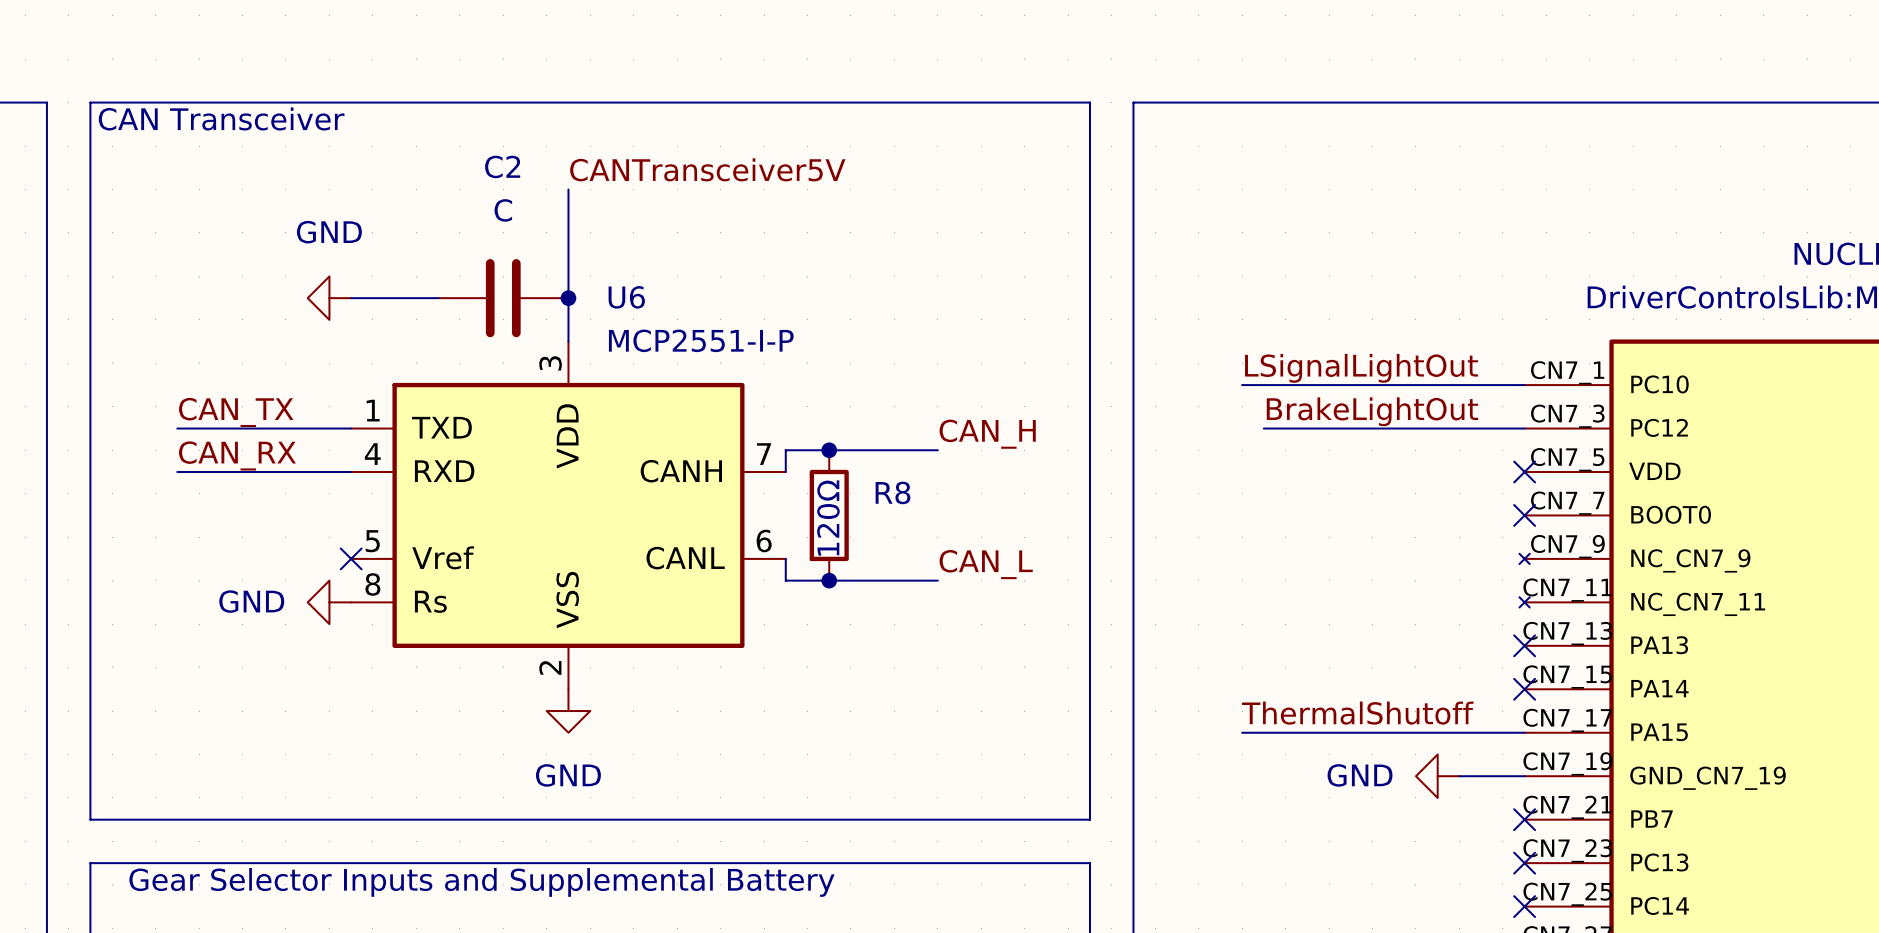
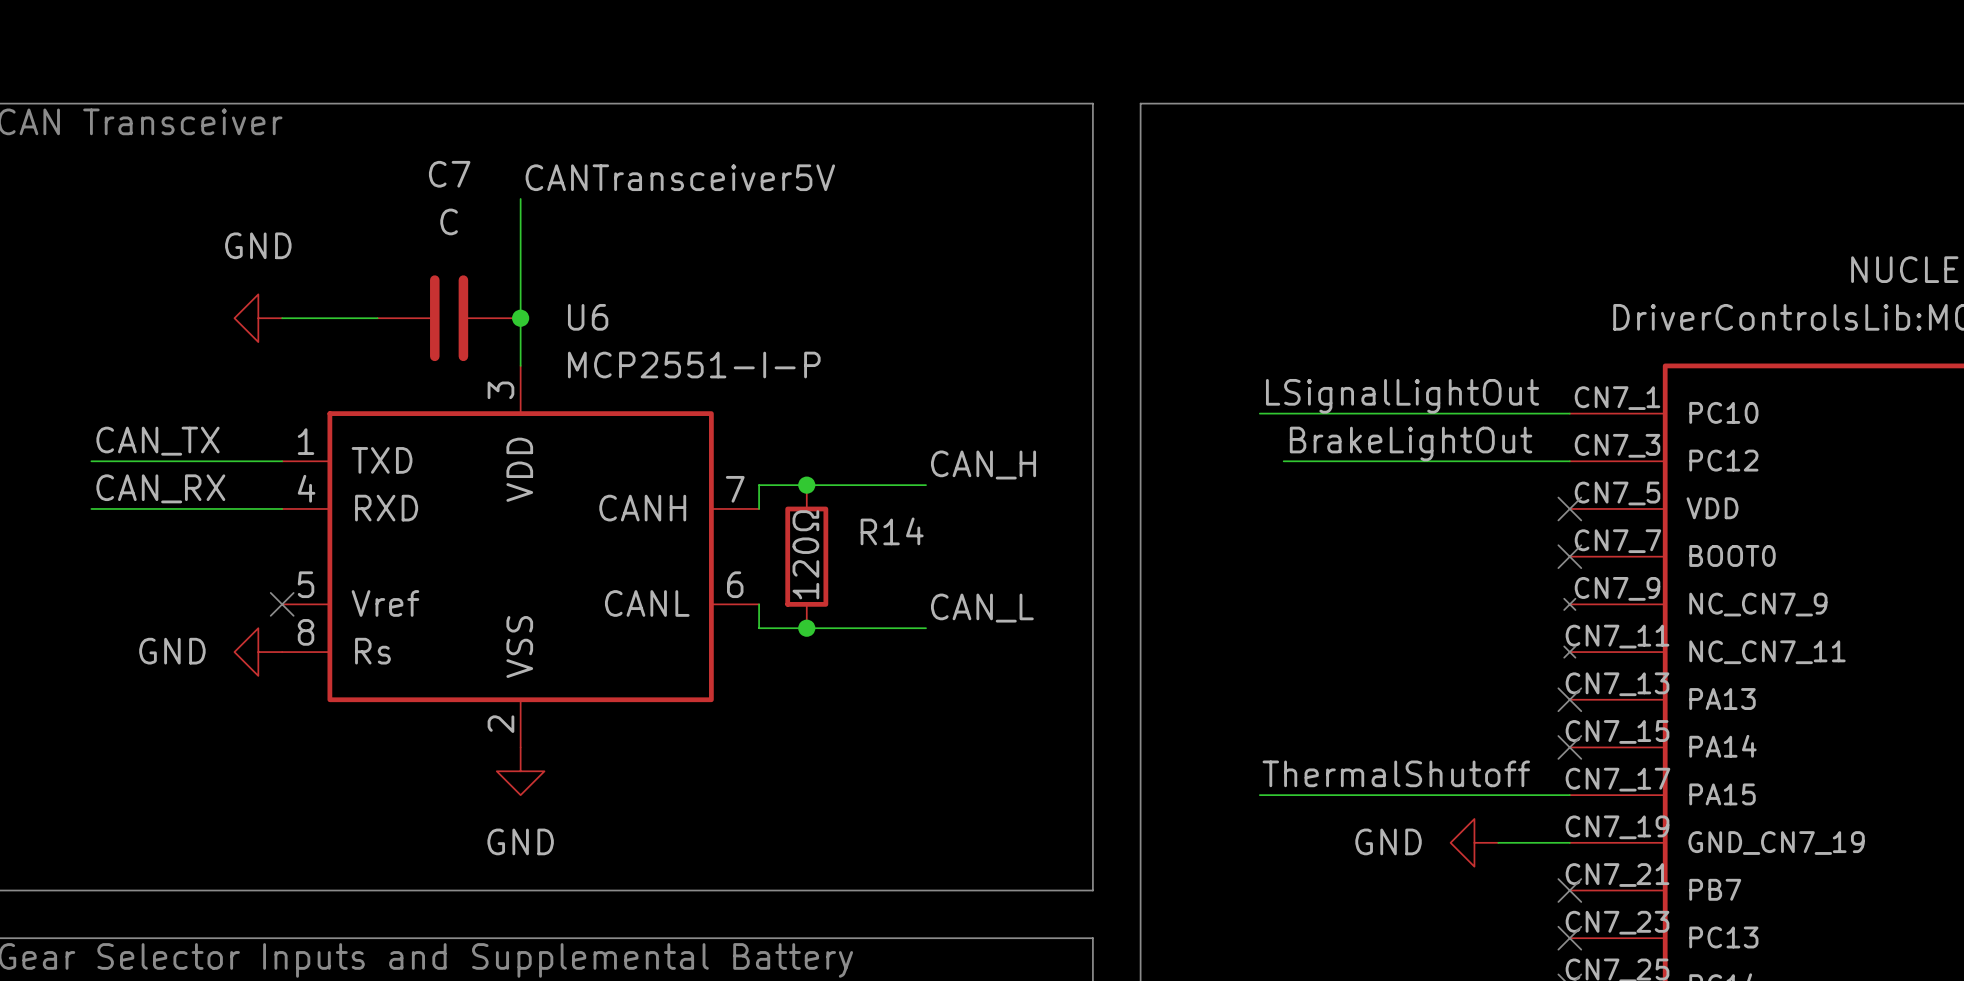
C2 name: C2 (502, 166) -> C7 (449, 174)
R8 name: R8 (892, 492) -> R14 (892, 531)

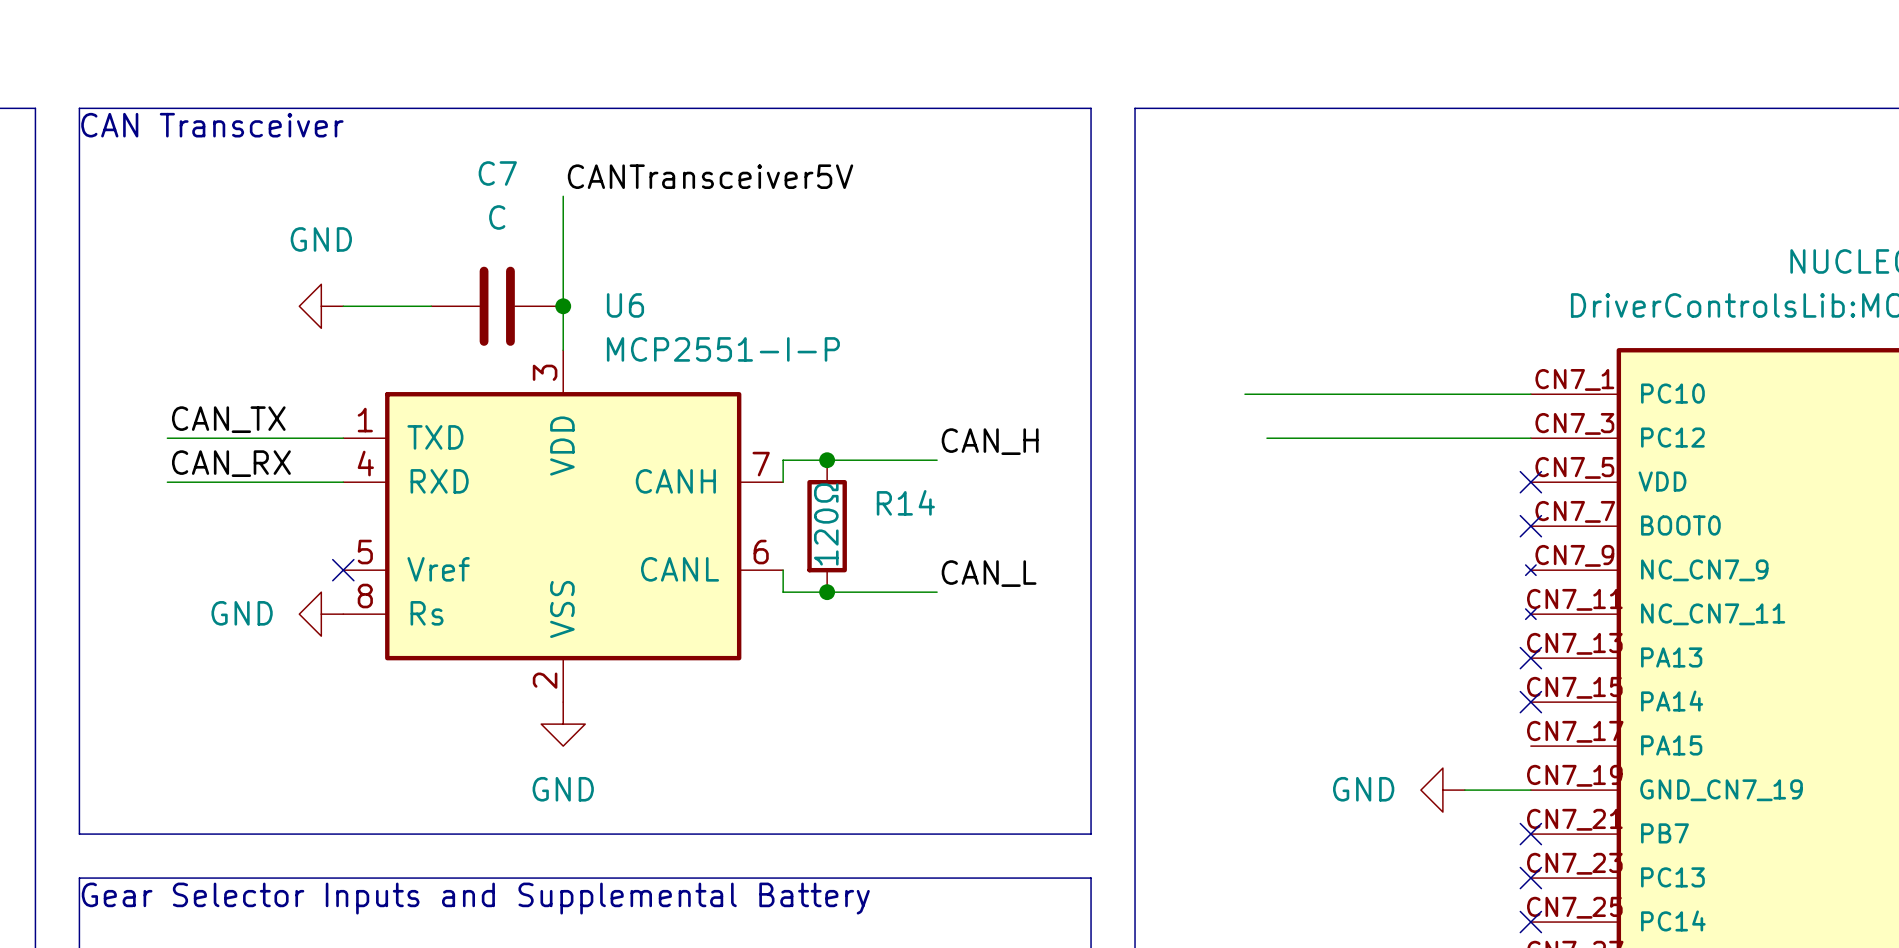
label: LSignalLightOut (1402, 396) -> none
label: BrakeLightOut (1411, 443) -> none
label: ThermalShutoff (1396, 773) -> none
wire: (1259, 795) (1569, 795) -> none

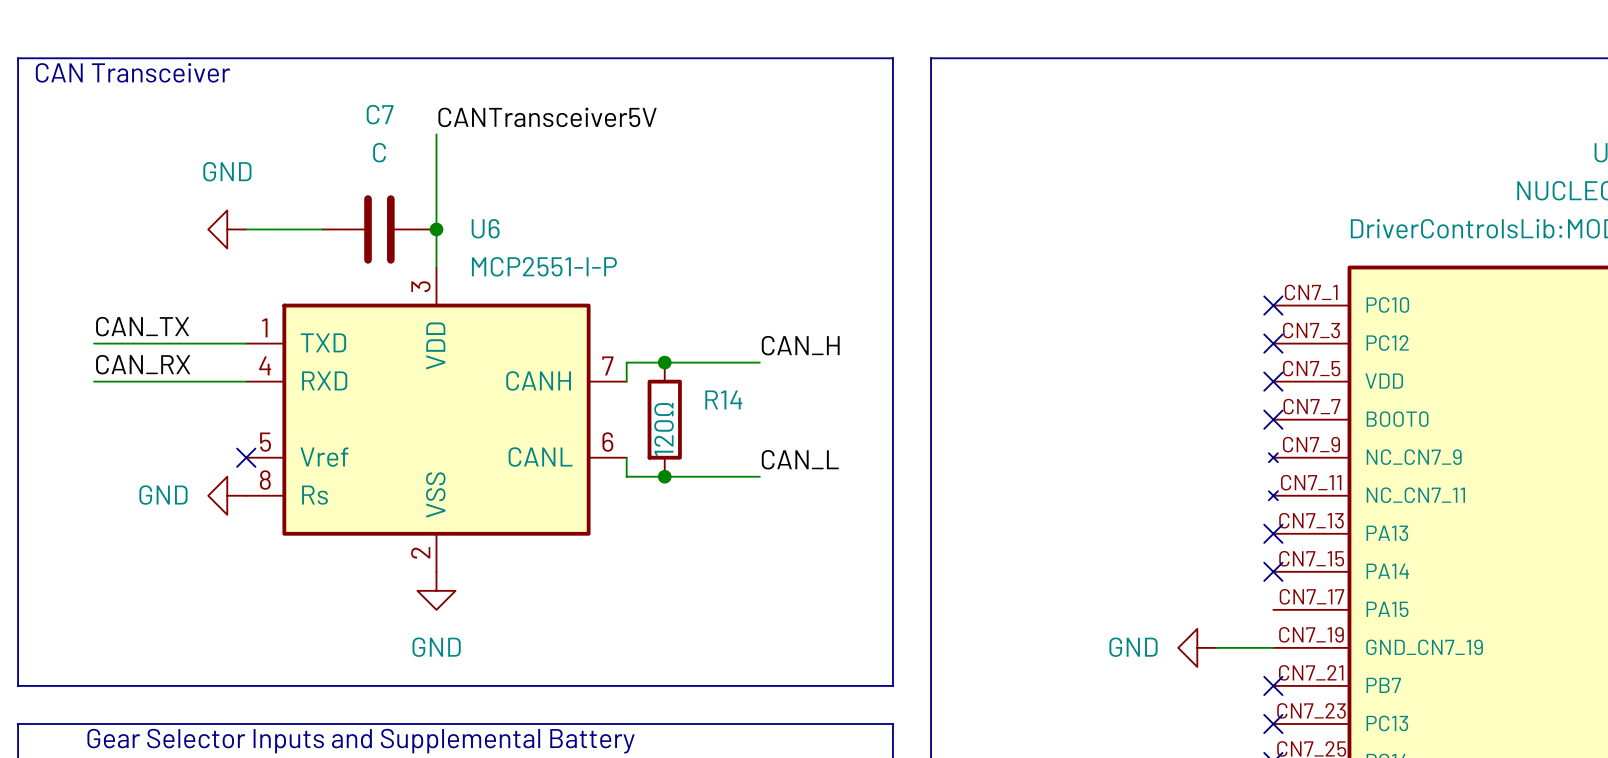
wire: (1244, 394) (1530, 394) -> none
no-connect mark: none -> (1273, 305)
wire: (1266, 438) (1530, 438) -> none
no-connect mark: none -> (1273, 343)

